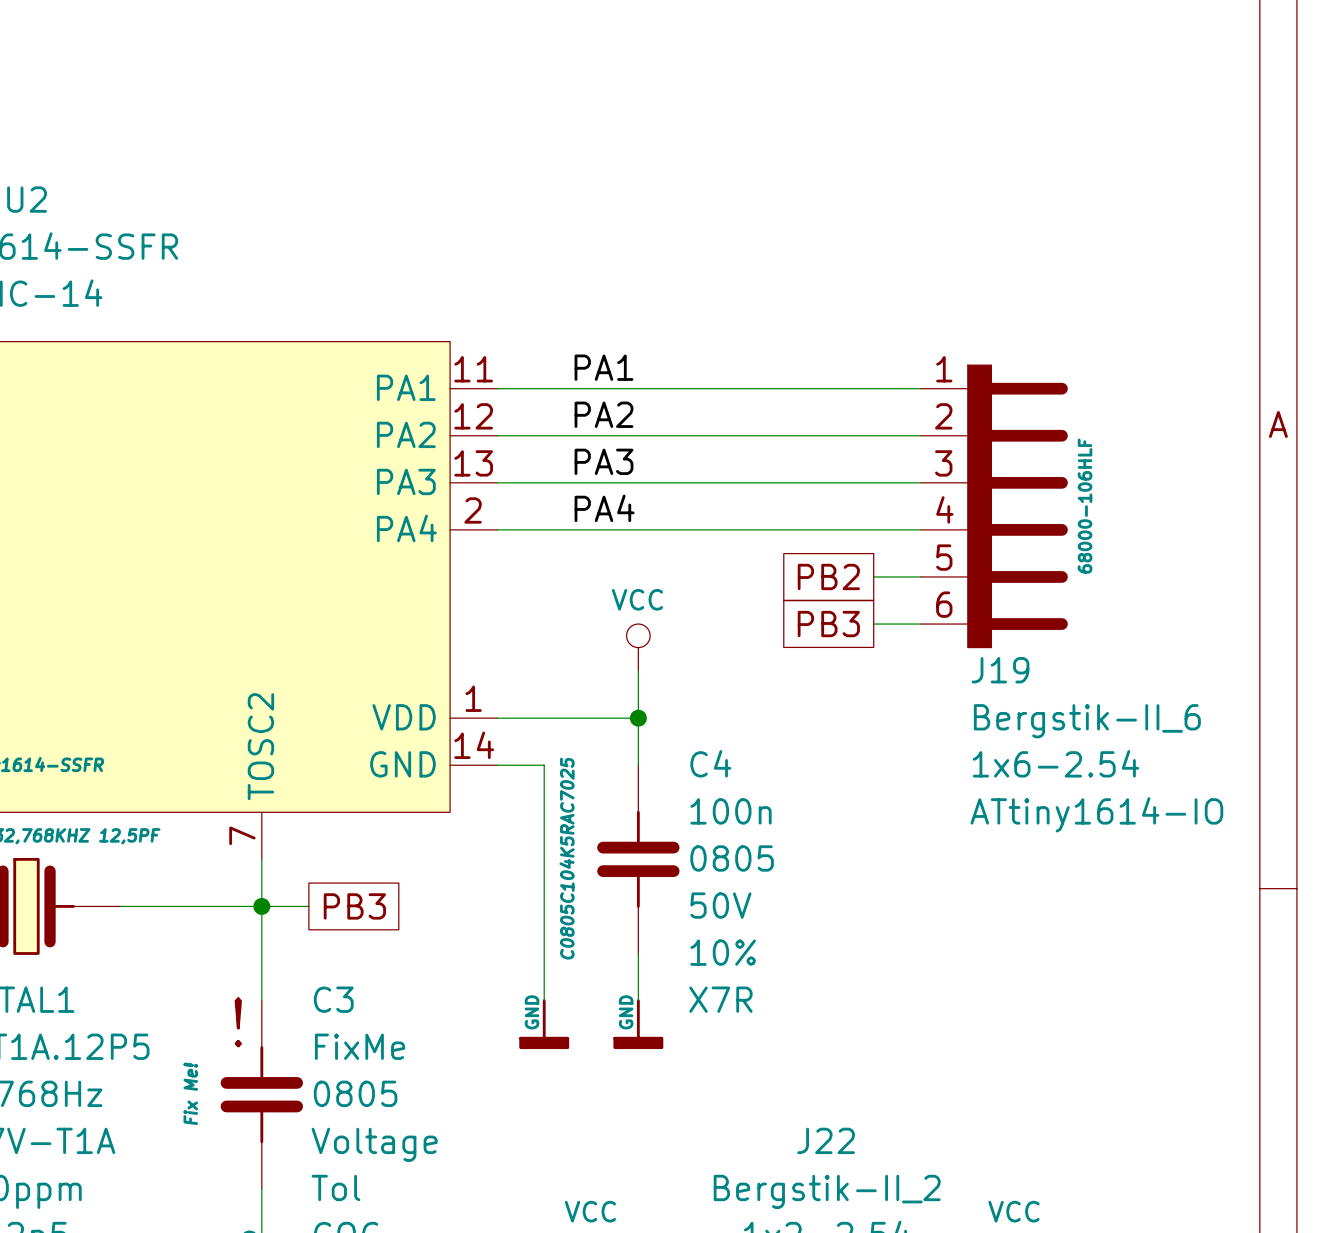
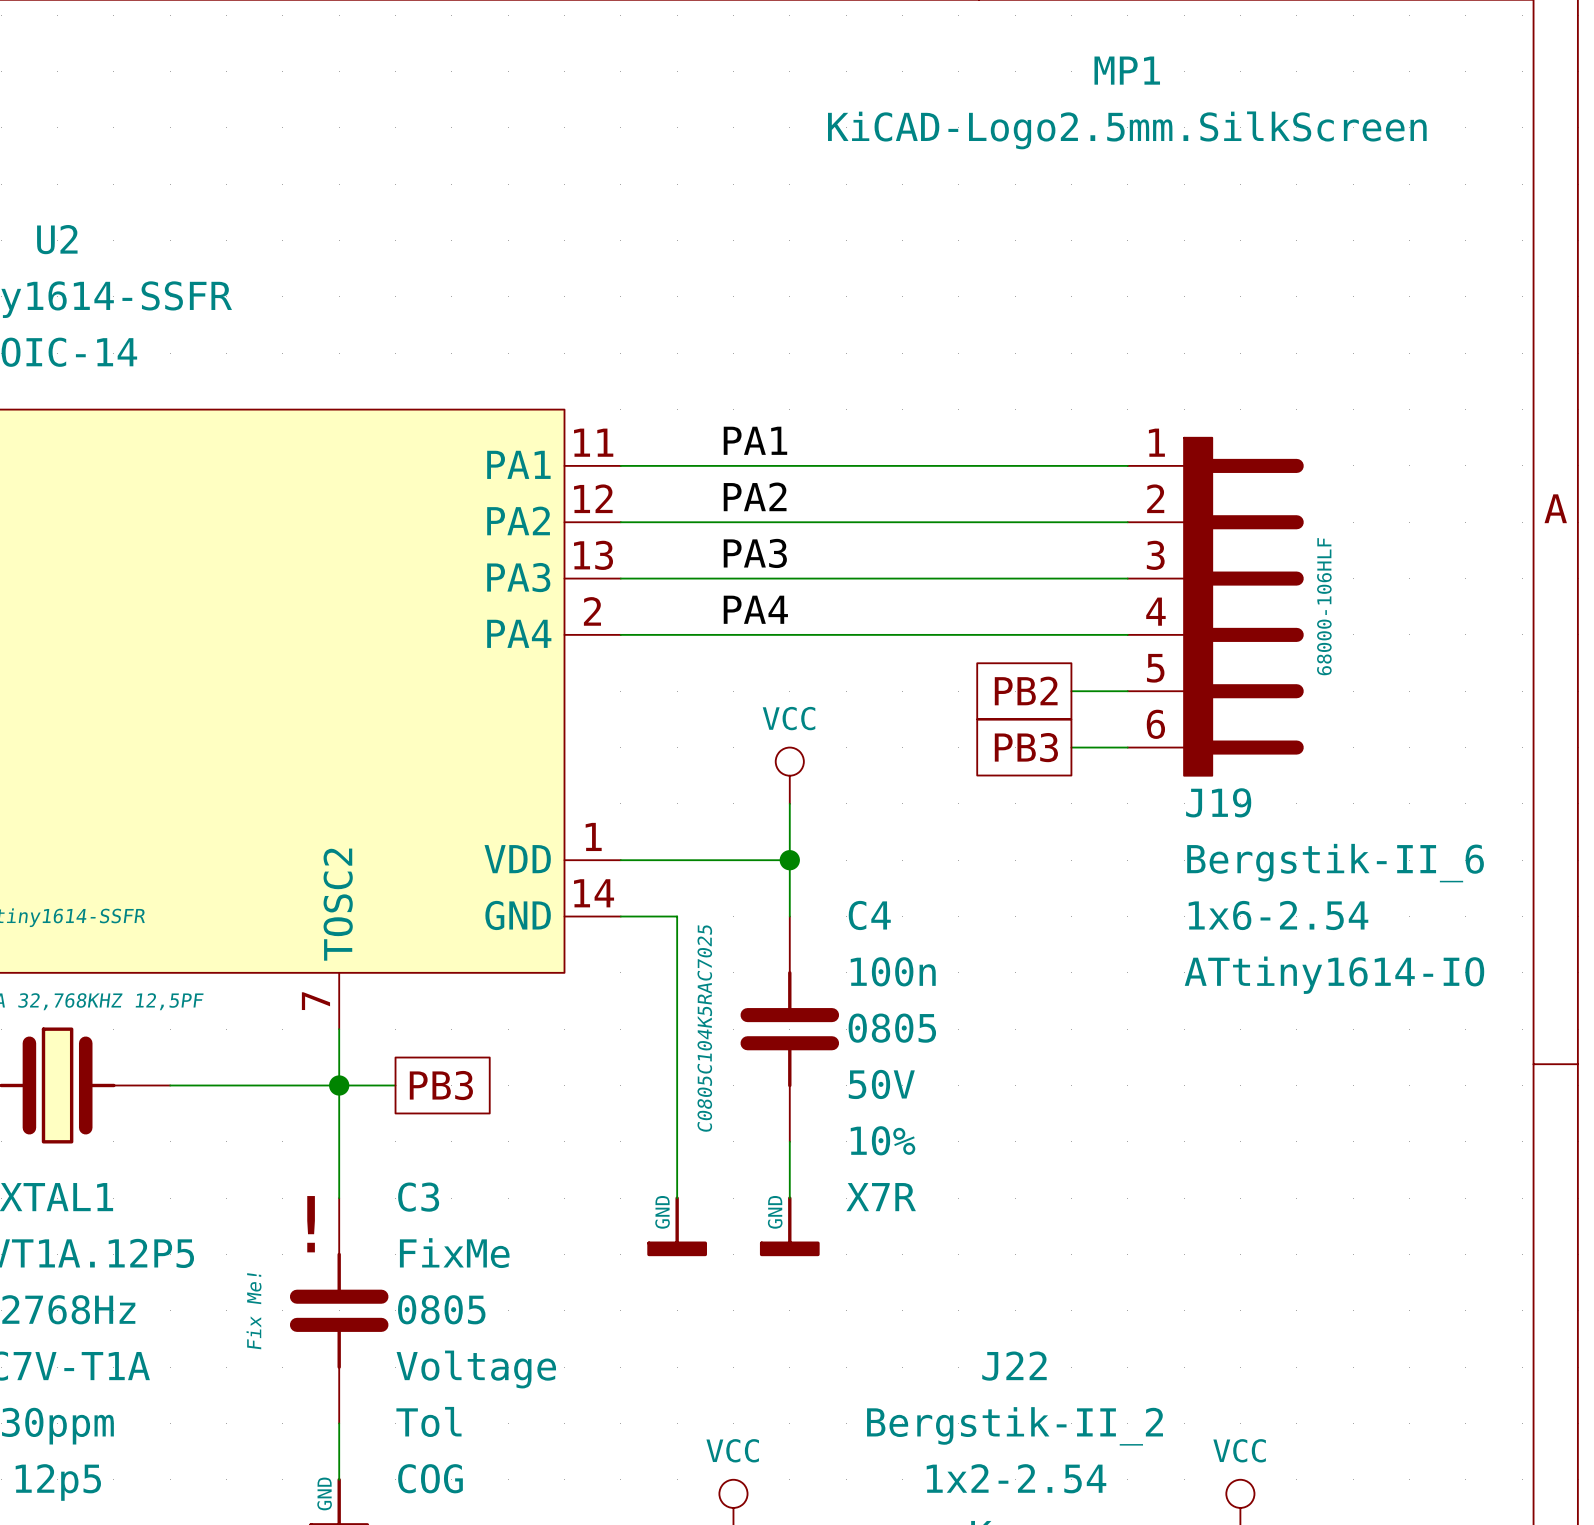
MP1: none -> KiCAD-Logo2.5mm.SilkScreen (1127, 102)

